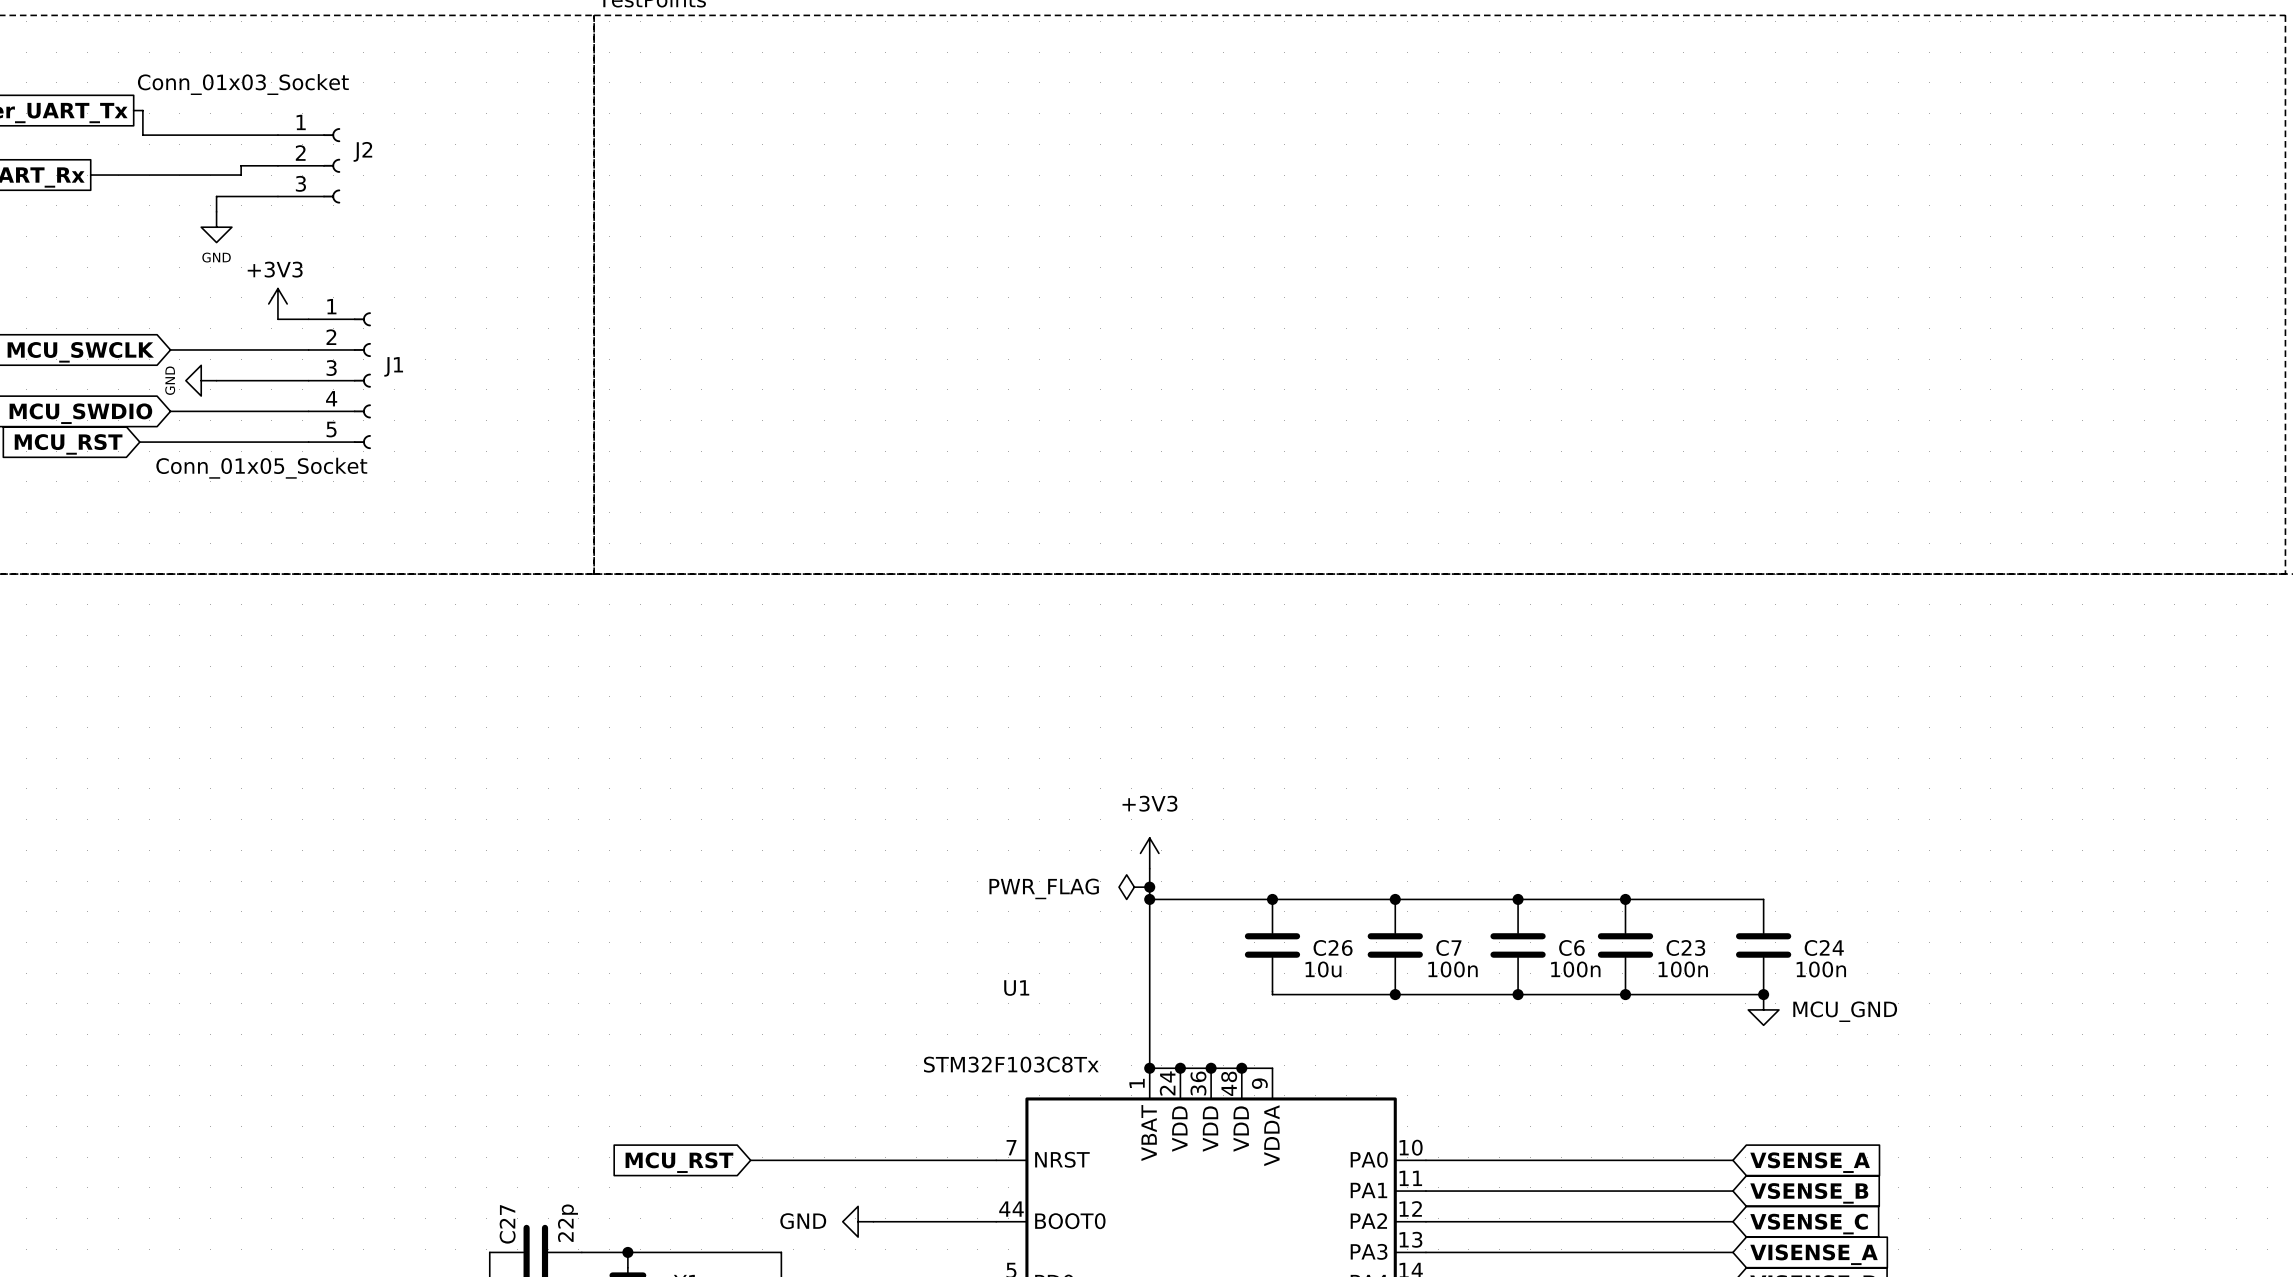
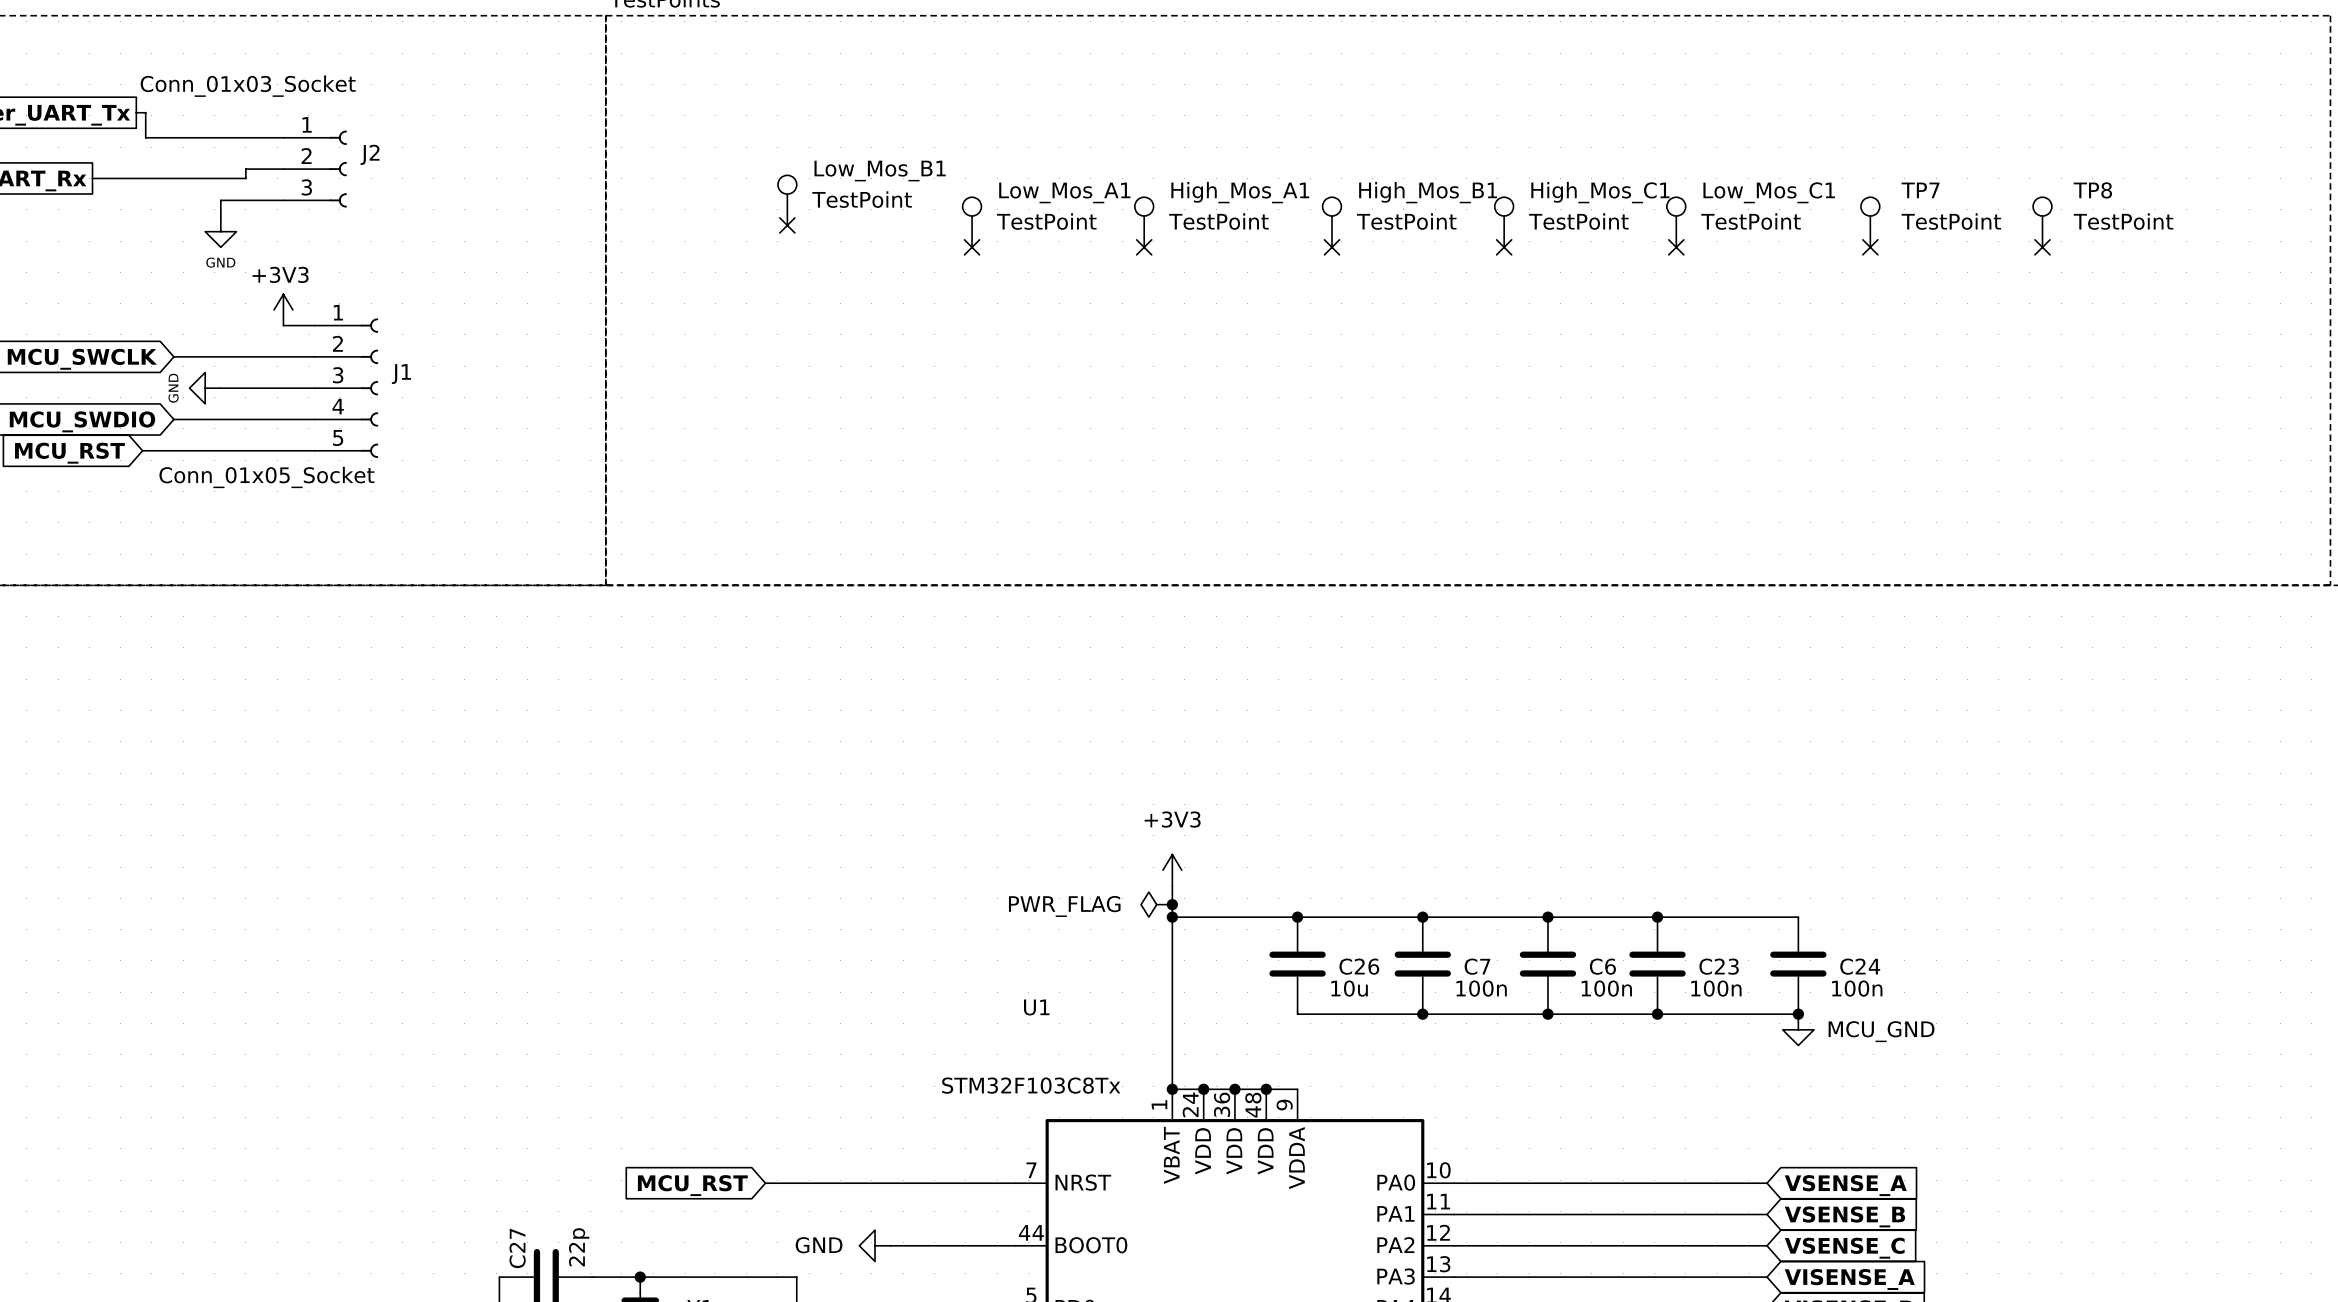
Low_Mos_B1: none -> TestPoint (787, 200)
Low_Mos_A1: none -> TestPoint (972, 222)
High_Mos_A1: none -> TestPoint (1144, 222)
High_Mos_B1: none -> TestPoint (1331, 222)
High_Mos_C1: none -> TestPoint (1504, 222)
Low_Mos_C1: none -> TestPoint (1676, 222)
TP7: none -> TestPoint (1870, 222)
TP8: none -> TestPoint (2042, 222)
no-connect mark: none -> (787, 225)
no-connect mark: none -> (972, 247)
no-connect mark: none -> (1144, 247)
no-connect mark: none -> (1331, 247)
no-connect mark: none -> (1504, 247)
no-connect mark: none -> (1676, 247)
no-connect mark: none -> (1870, 247)
no-connect mark: none -> (2042, 247)

